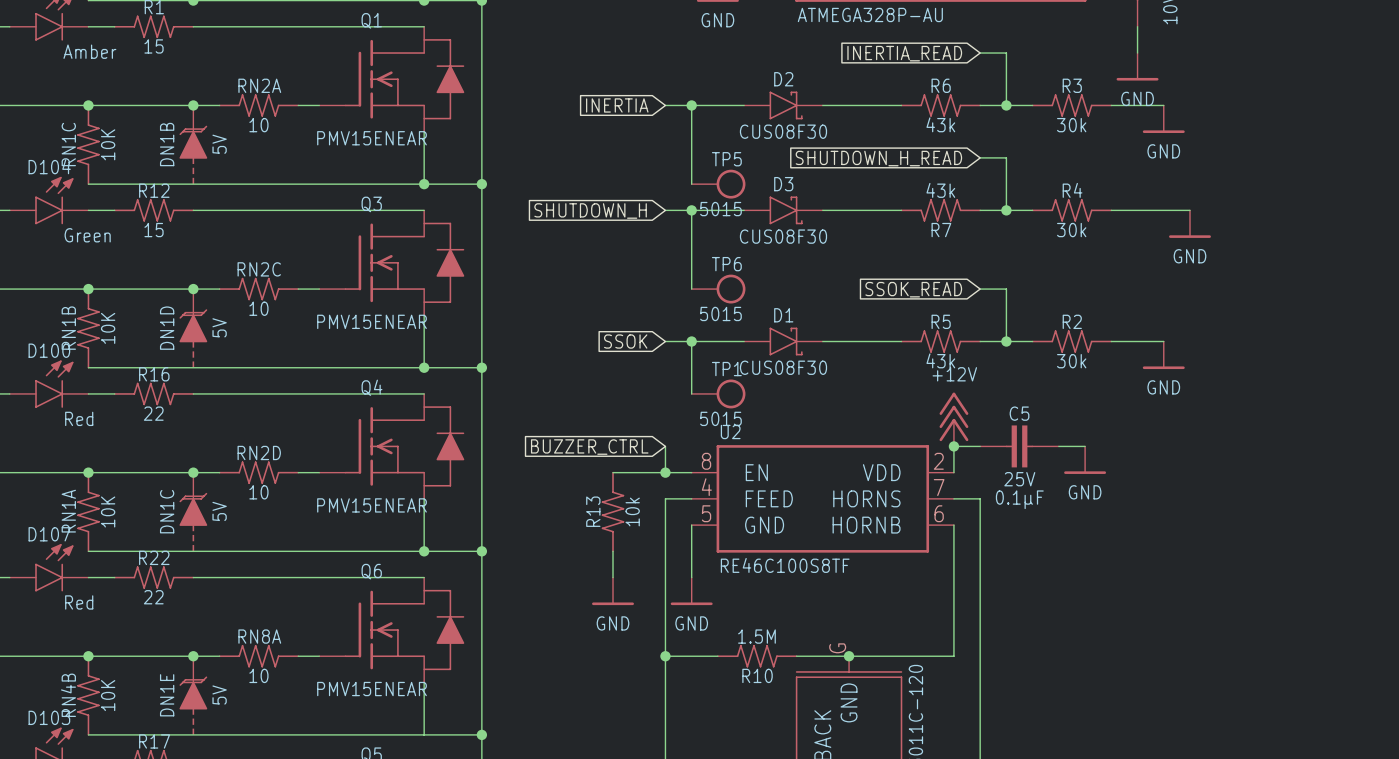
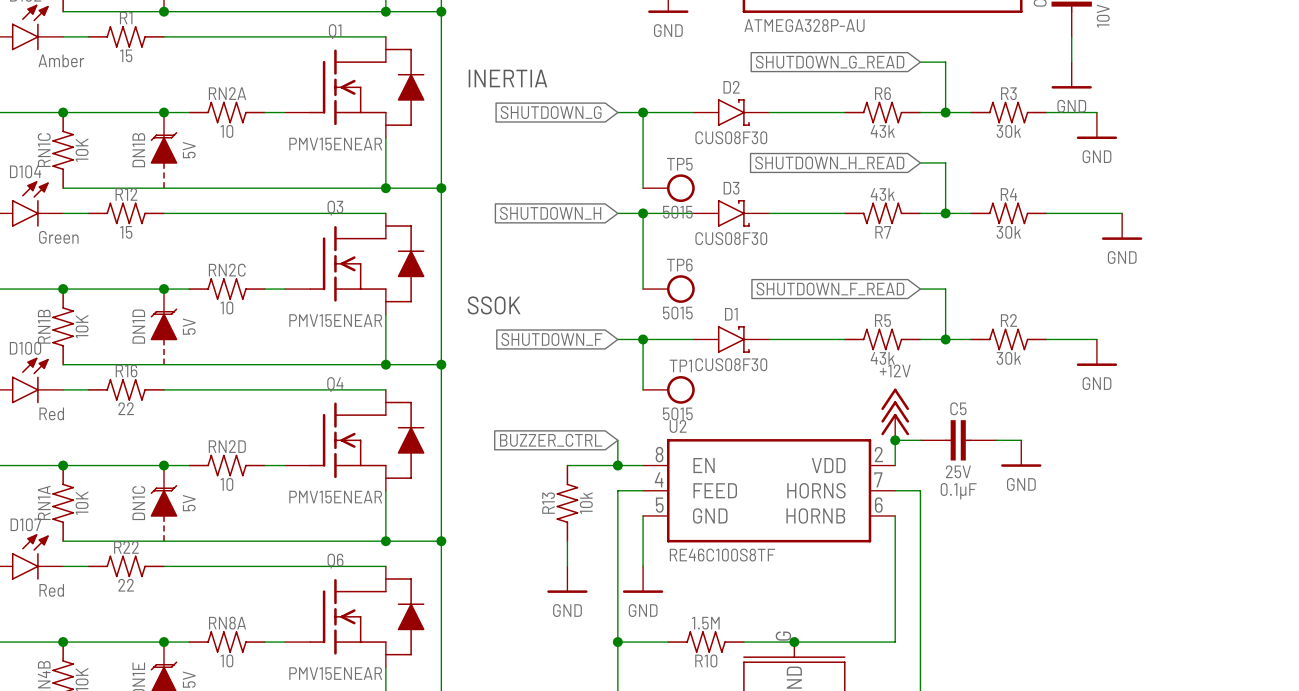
global label: INERTIA_READ (904, 53) -> SHUTDOWN_G_READ (830, 62)
text: none -> INERTIA (507, 78)
global label: INERTIA (617, 105) -> SHUTDOWN_G (551, 112)
global label: SSOK_READ (913, 289) -> SHUTDOWN_F_READ (830, 289)
text: none -> SSOK (494, 305)
global label: SSOK (625, 341) -> SHUTDOWN_F (551, 339)

